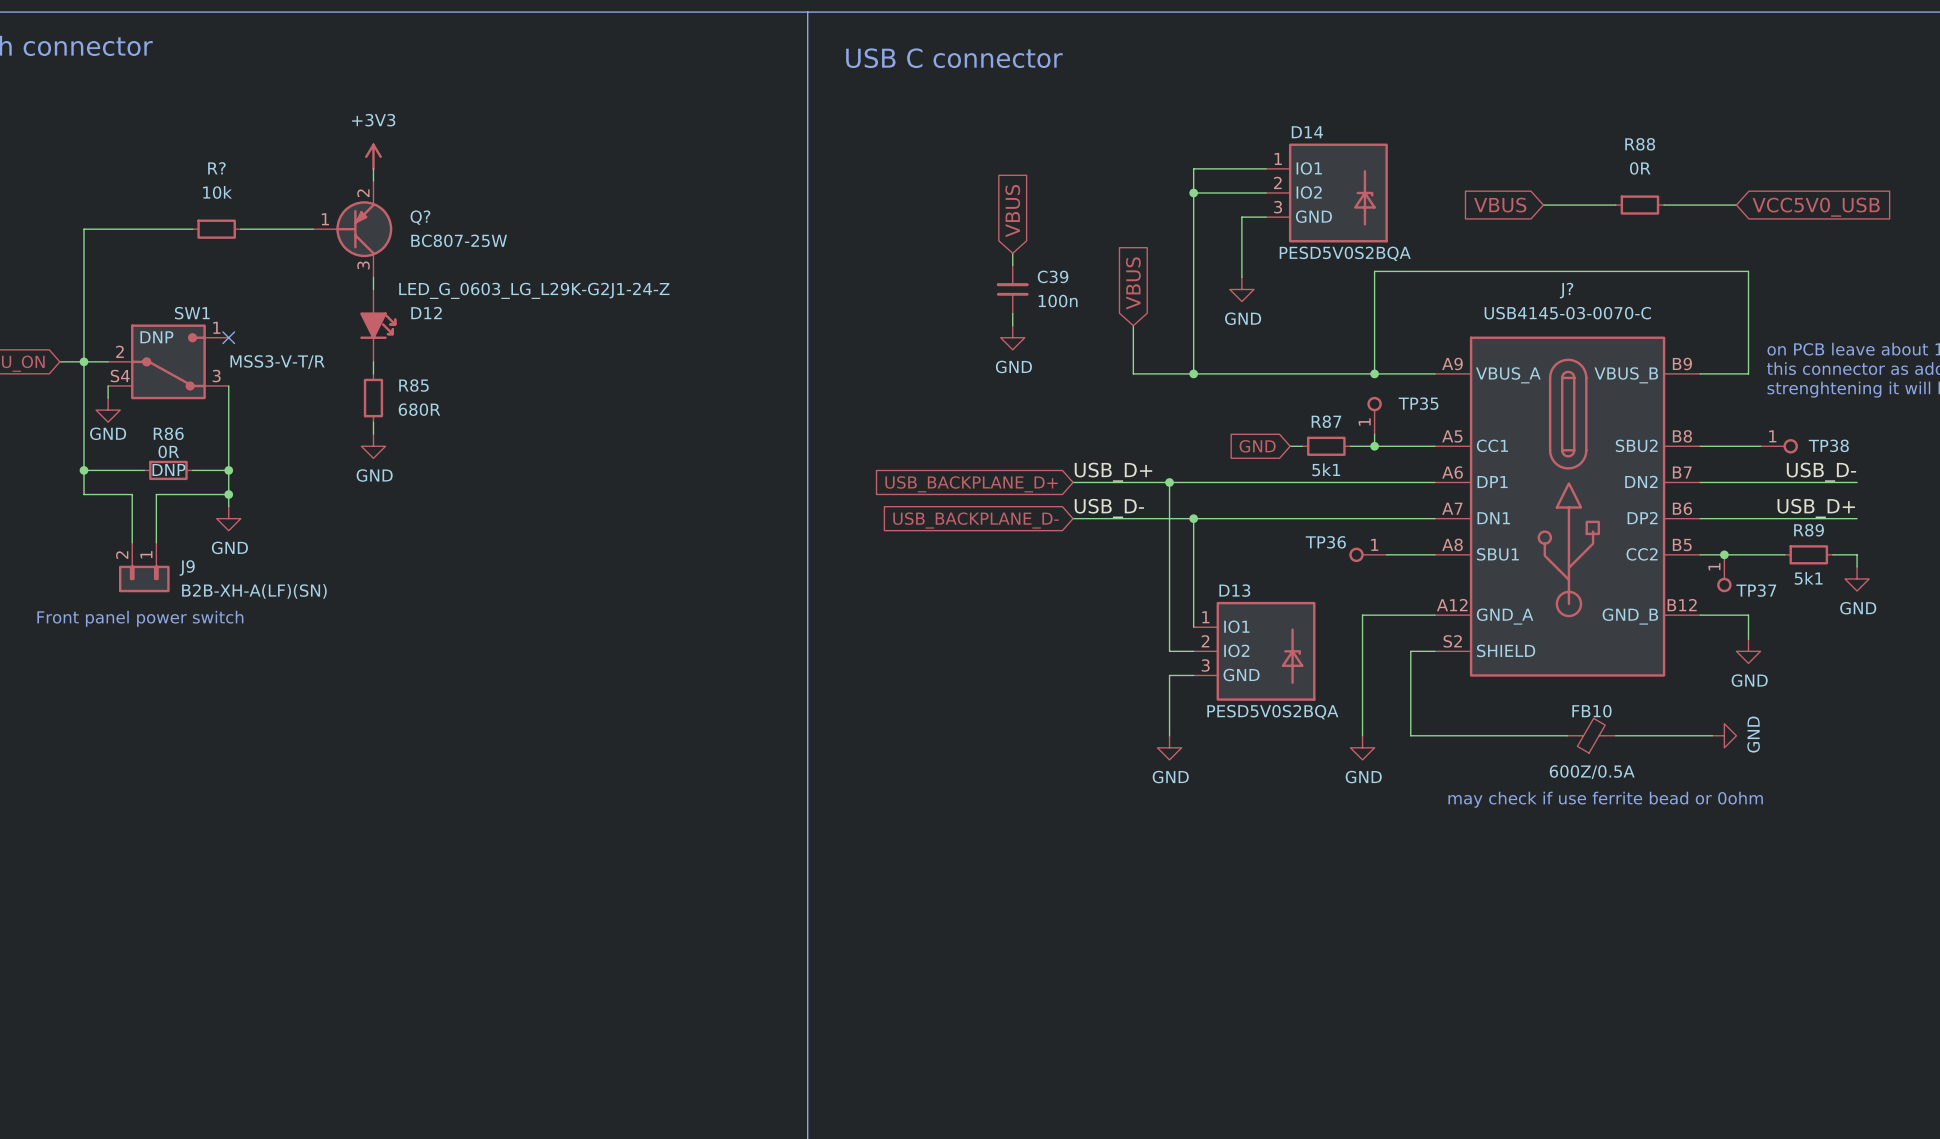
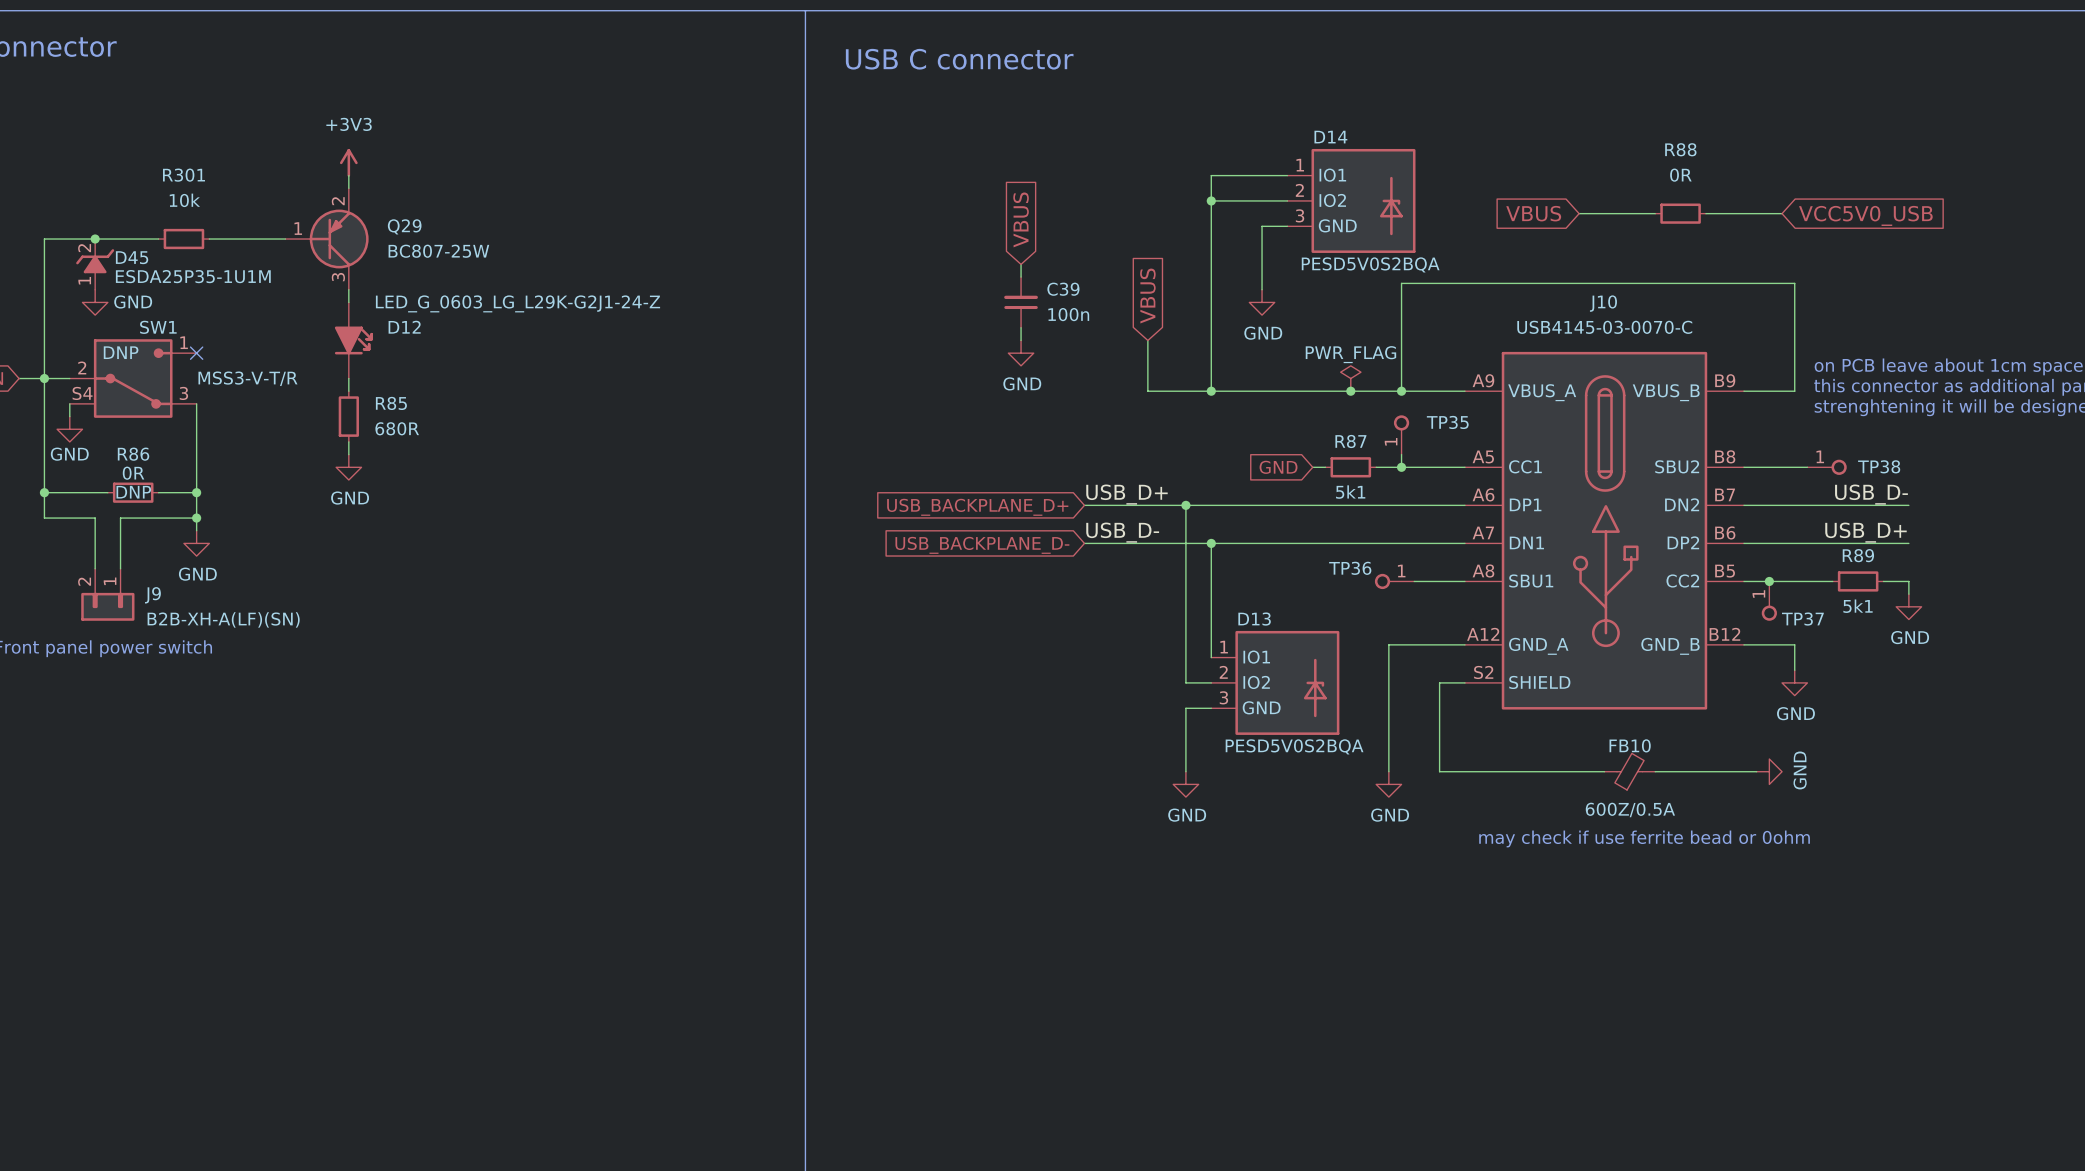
R? name: R? (216, 168) -> R301 (183, 175)
Q? name: Q? (420, 217) -> Q29 (404, 226)
junction: none -> (95, 239)
D45: none -> ESDA25P35-1U1M (95, 264)
power symbol: none -> GND (95, 302)
J? name: J? (1566, 290) -> J10 (1603, 303)
power symbol: none -> PWR_FLAG (1350, 378)
junction: none -> (1350, 391)

